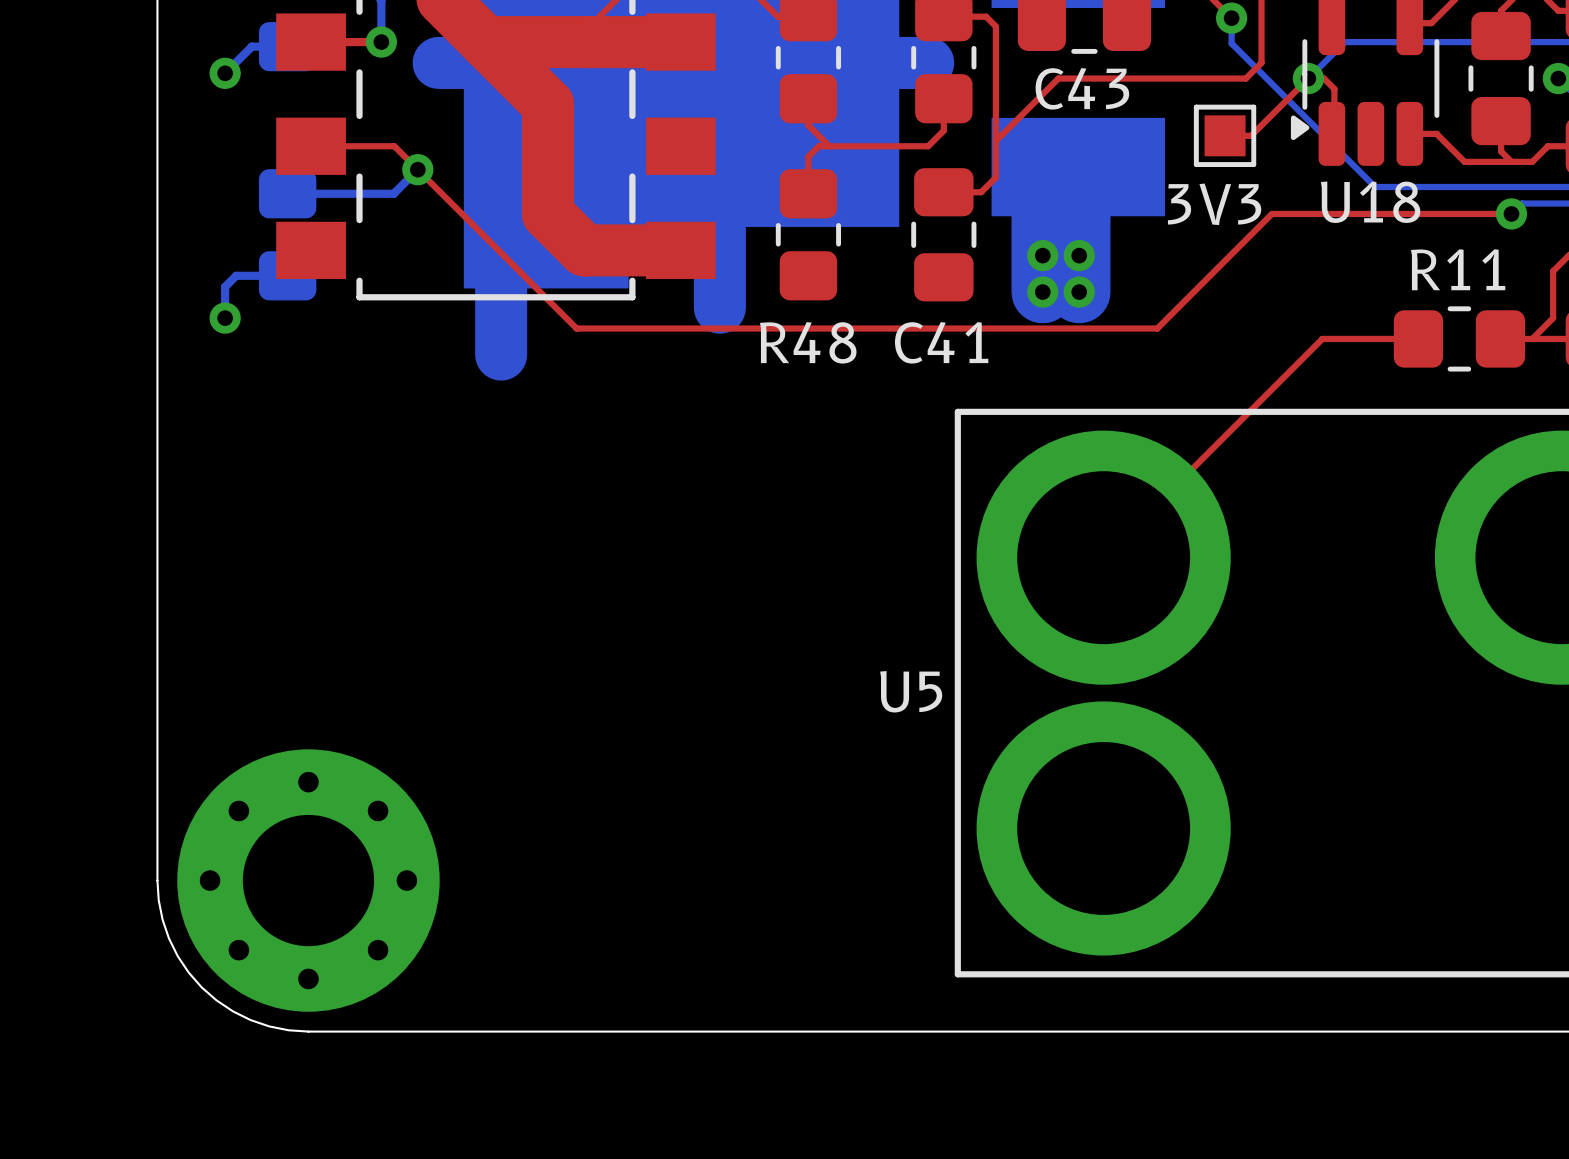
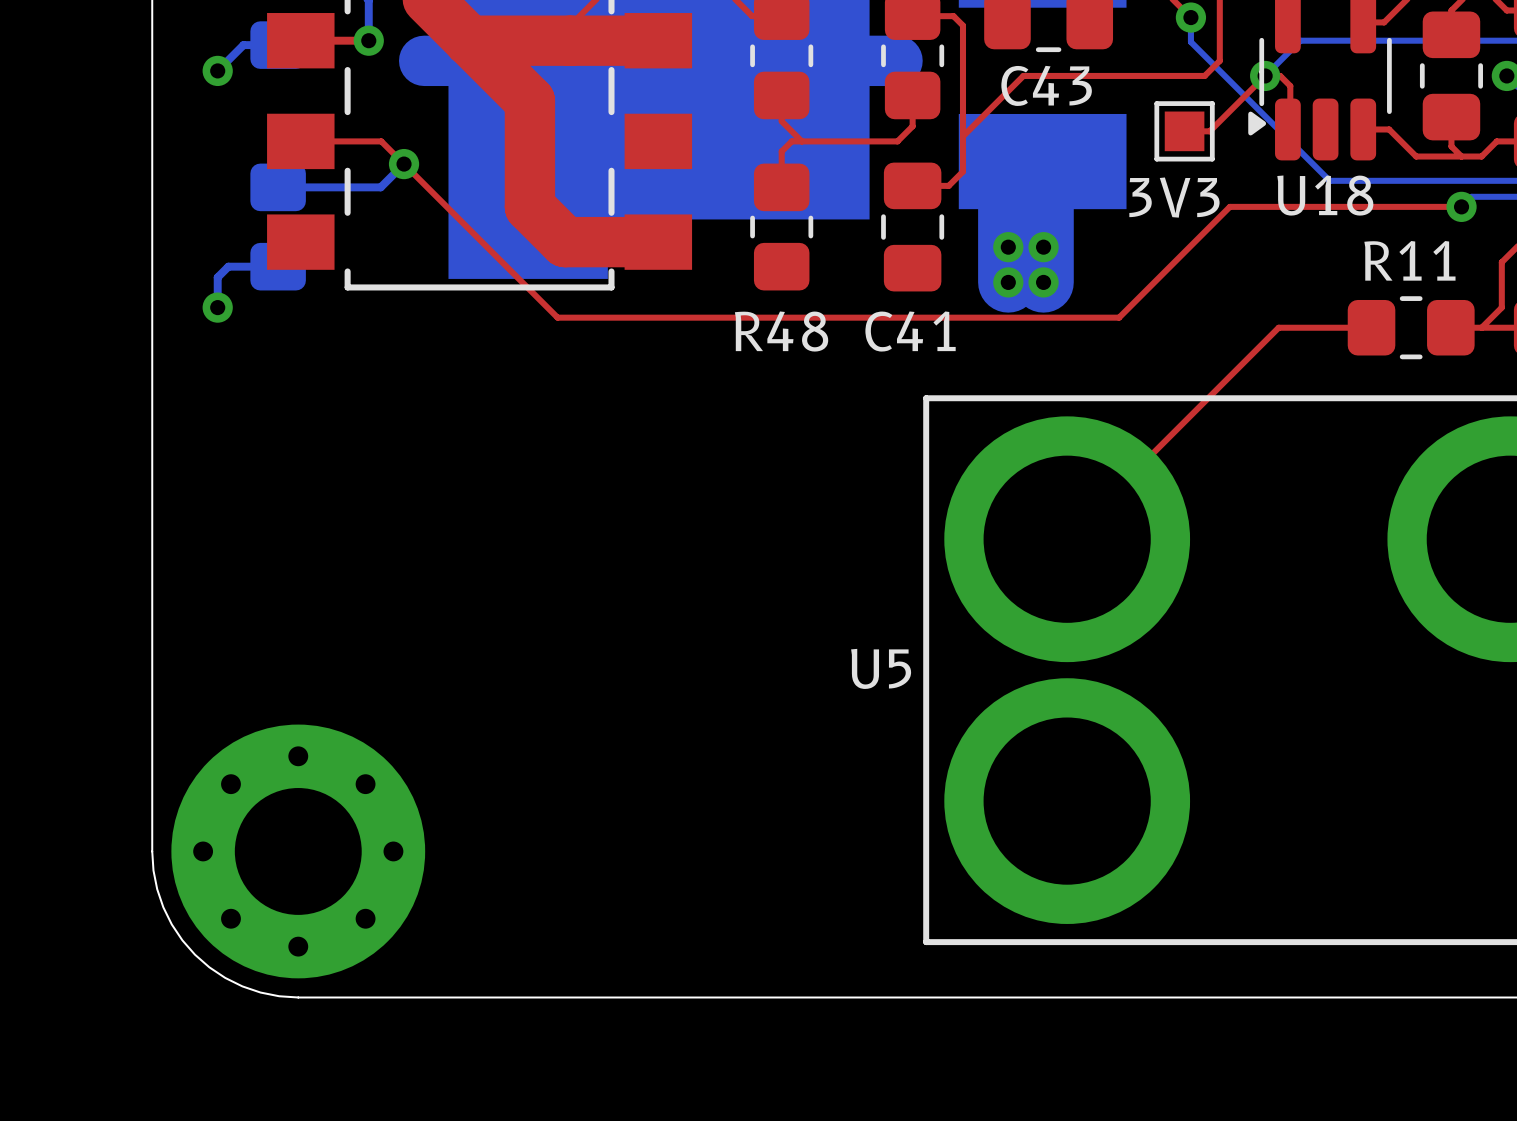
bottom track: (719, 208) (719, 307) -> none
bottom track: (501, 255) (501, 354) -> none

